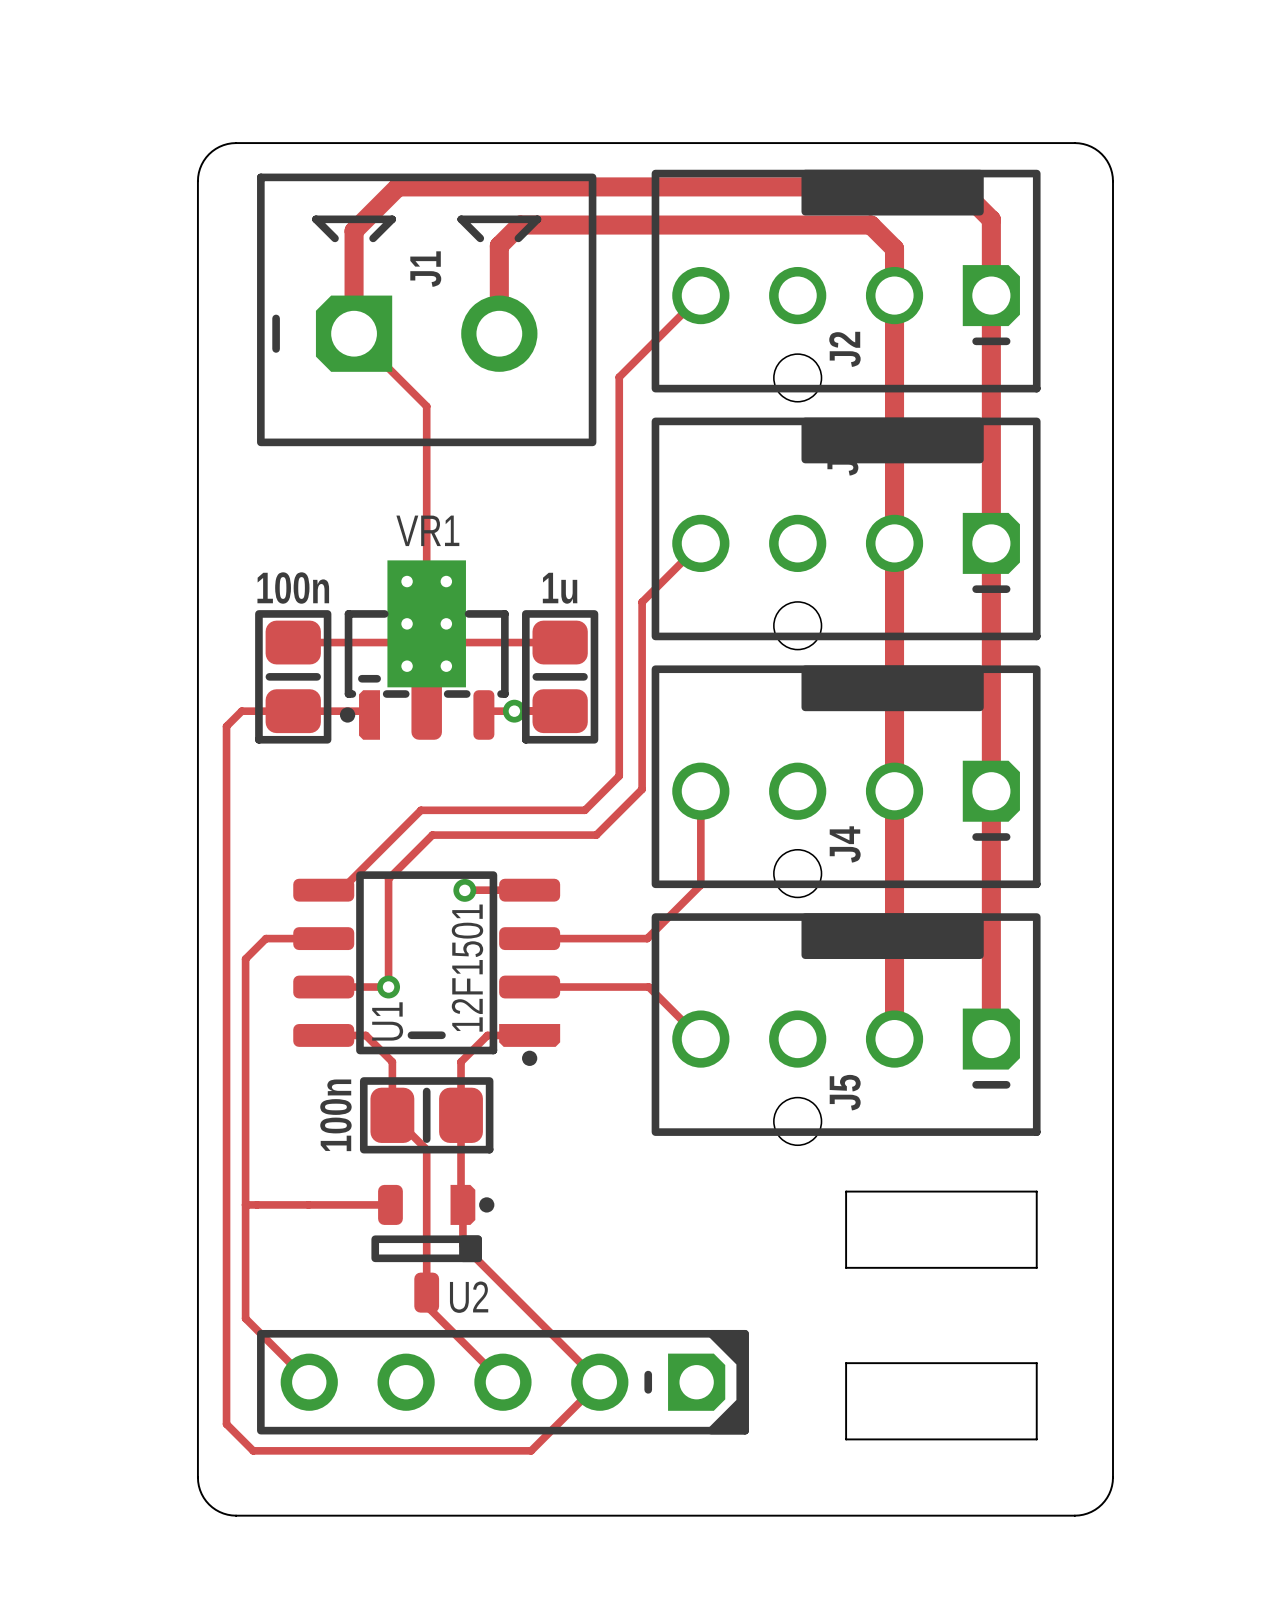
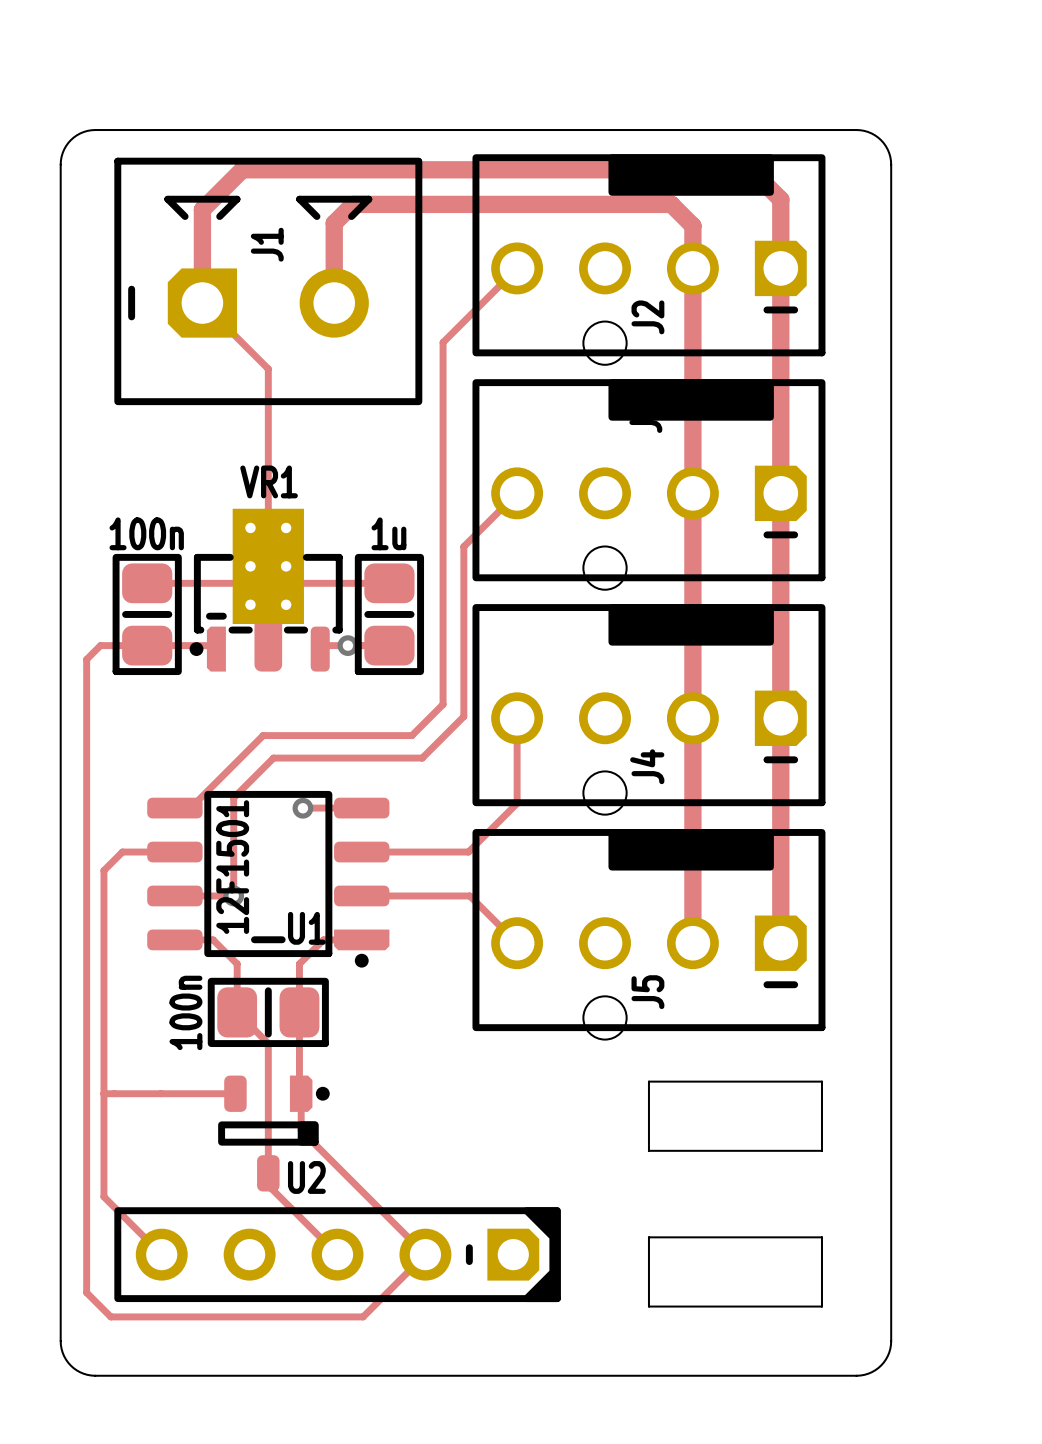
U1 value position: 12F1501 (467, 968) -> 12F1501 (232, 867)
U1 name rotation: 0° (387, 1021) -> 90° clockwise (306, 928)
U1 name position: U1 (387, 1021) -> U1 (306, 928)

